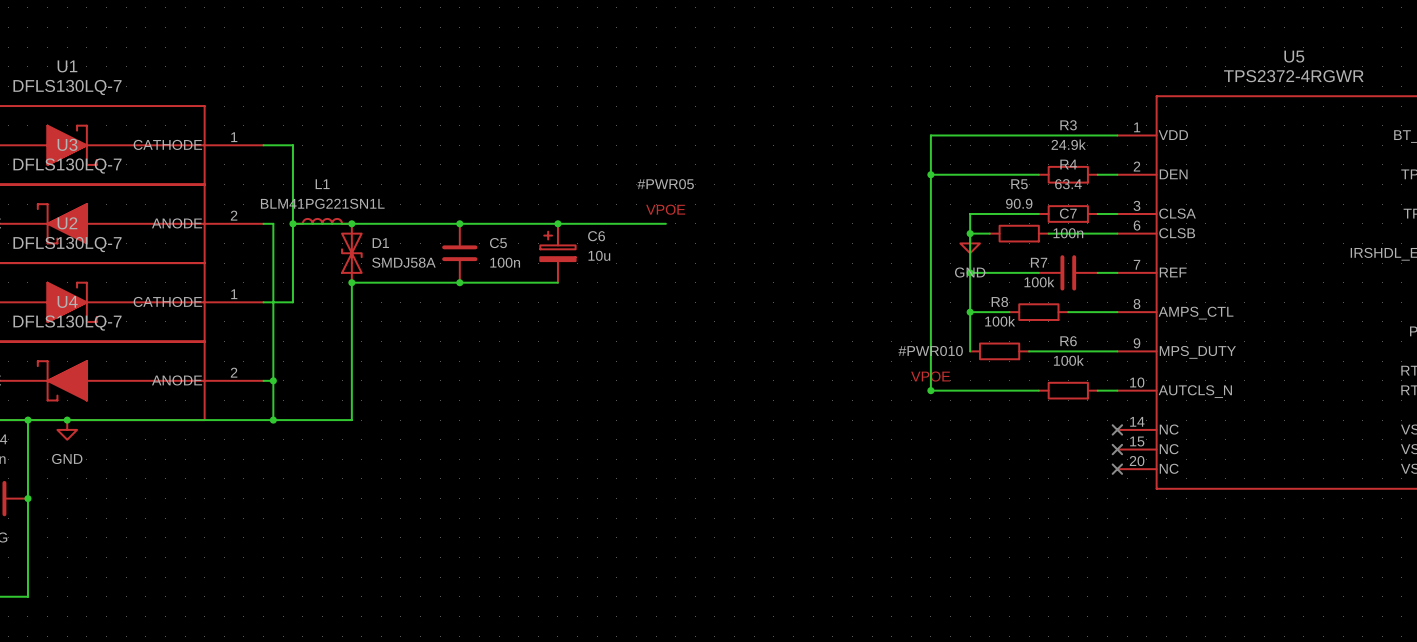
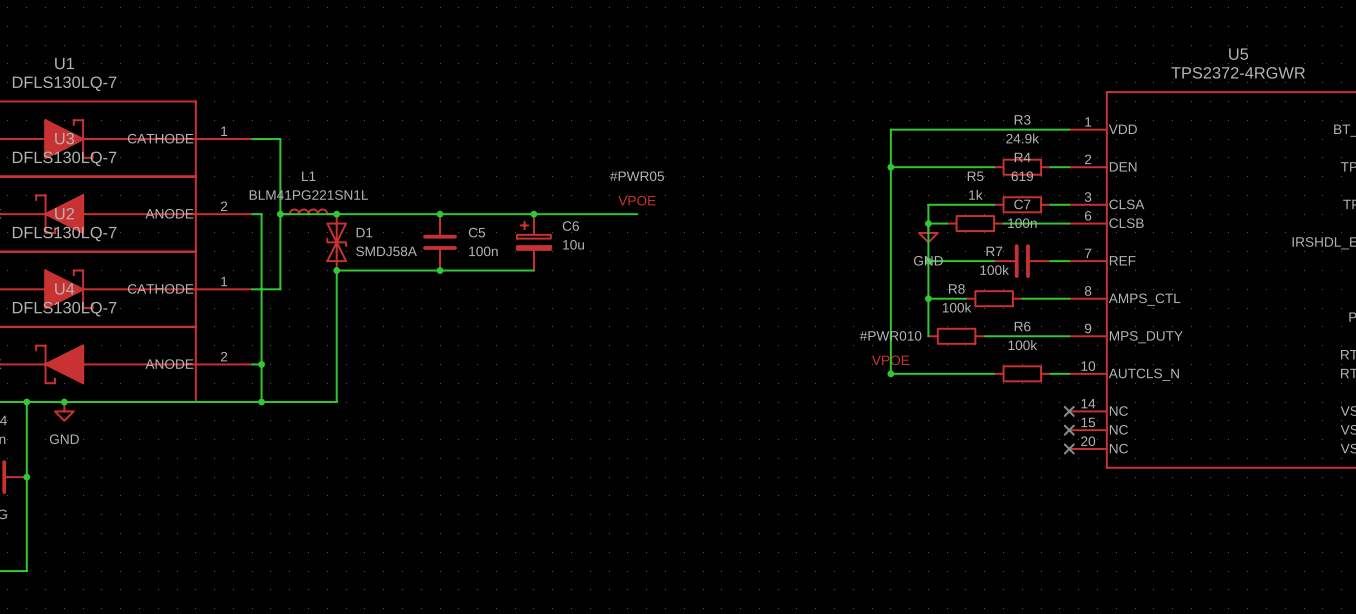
R4 value: 63.4 (1068, 184) -> 619 (1022, 176)
R5 value: 90.9 (1019, 203) -> 1k (975, 194)

